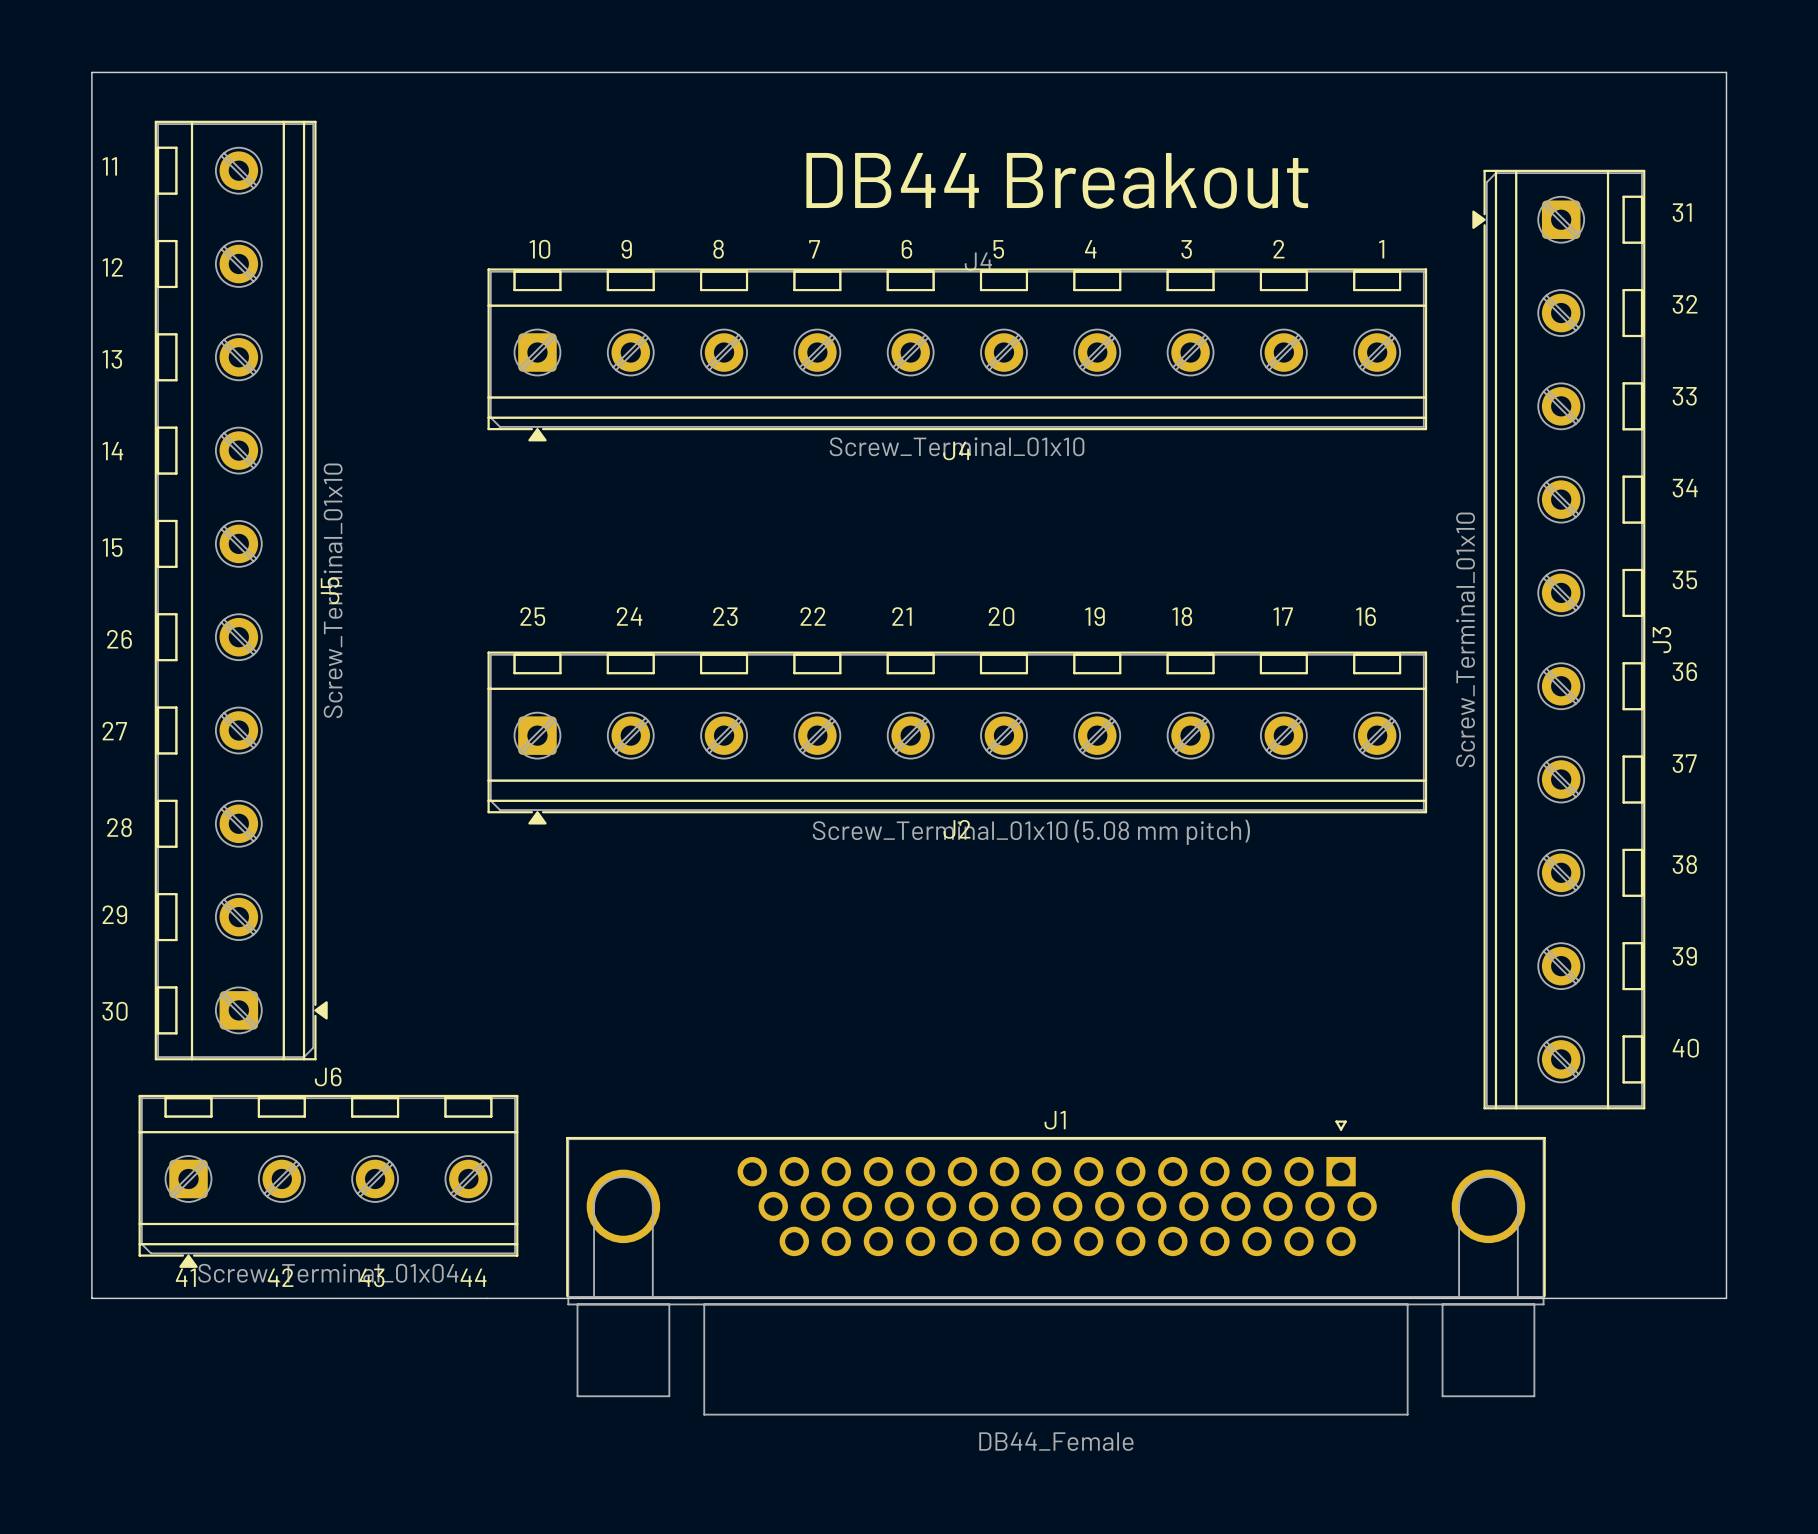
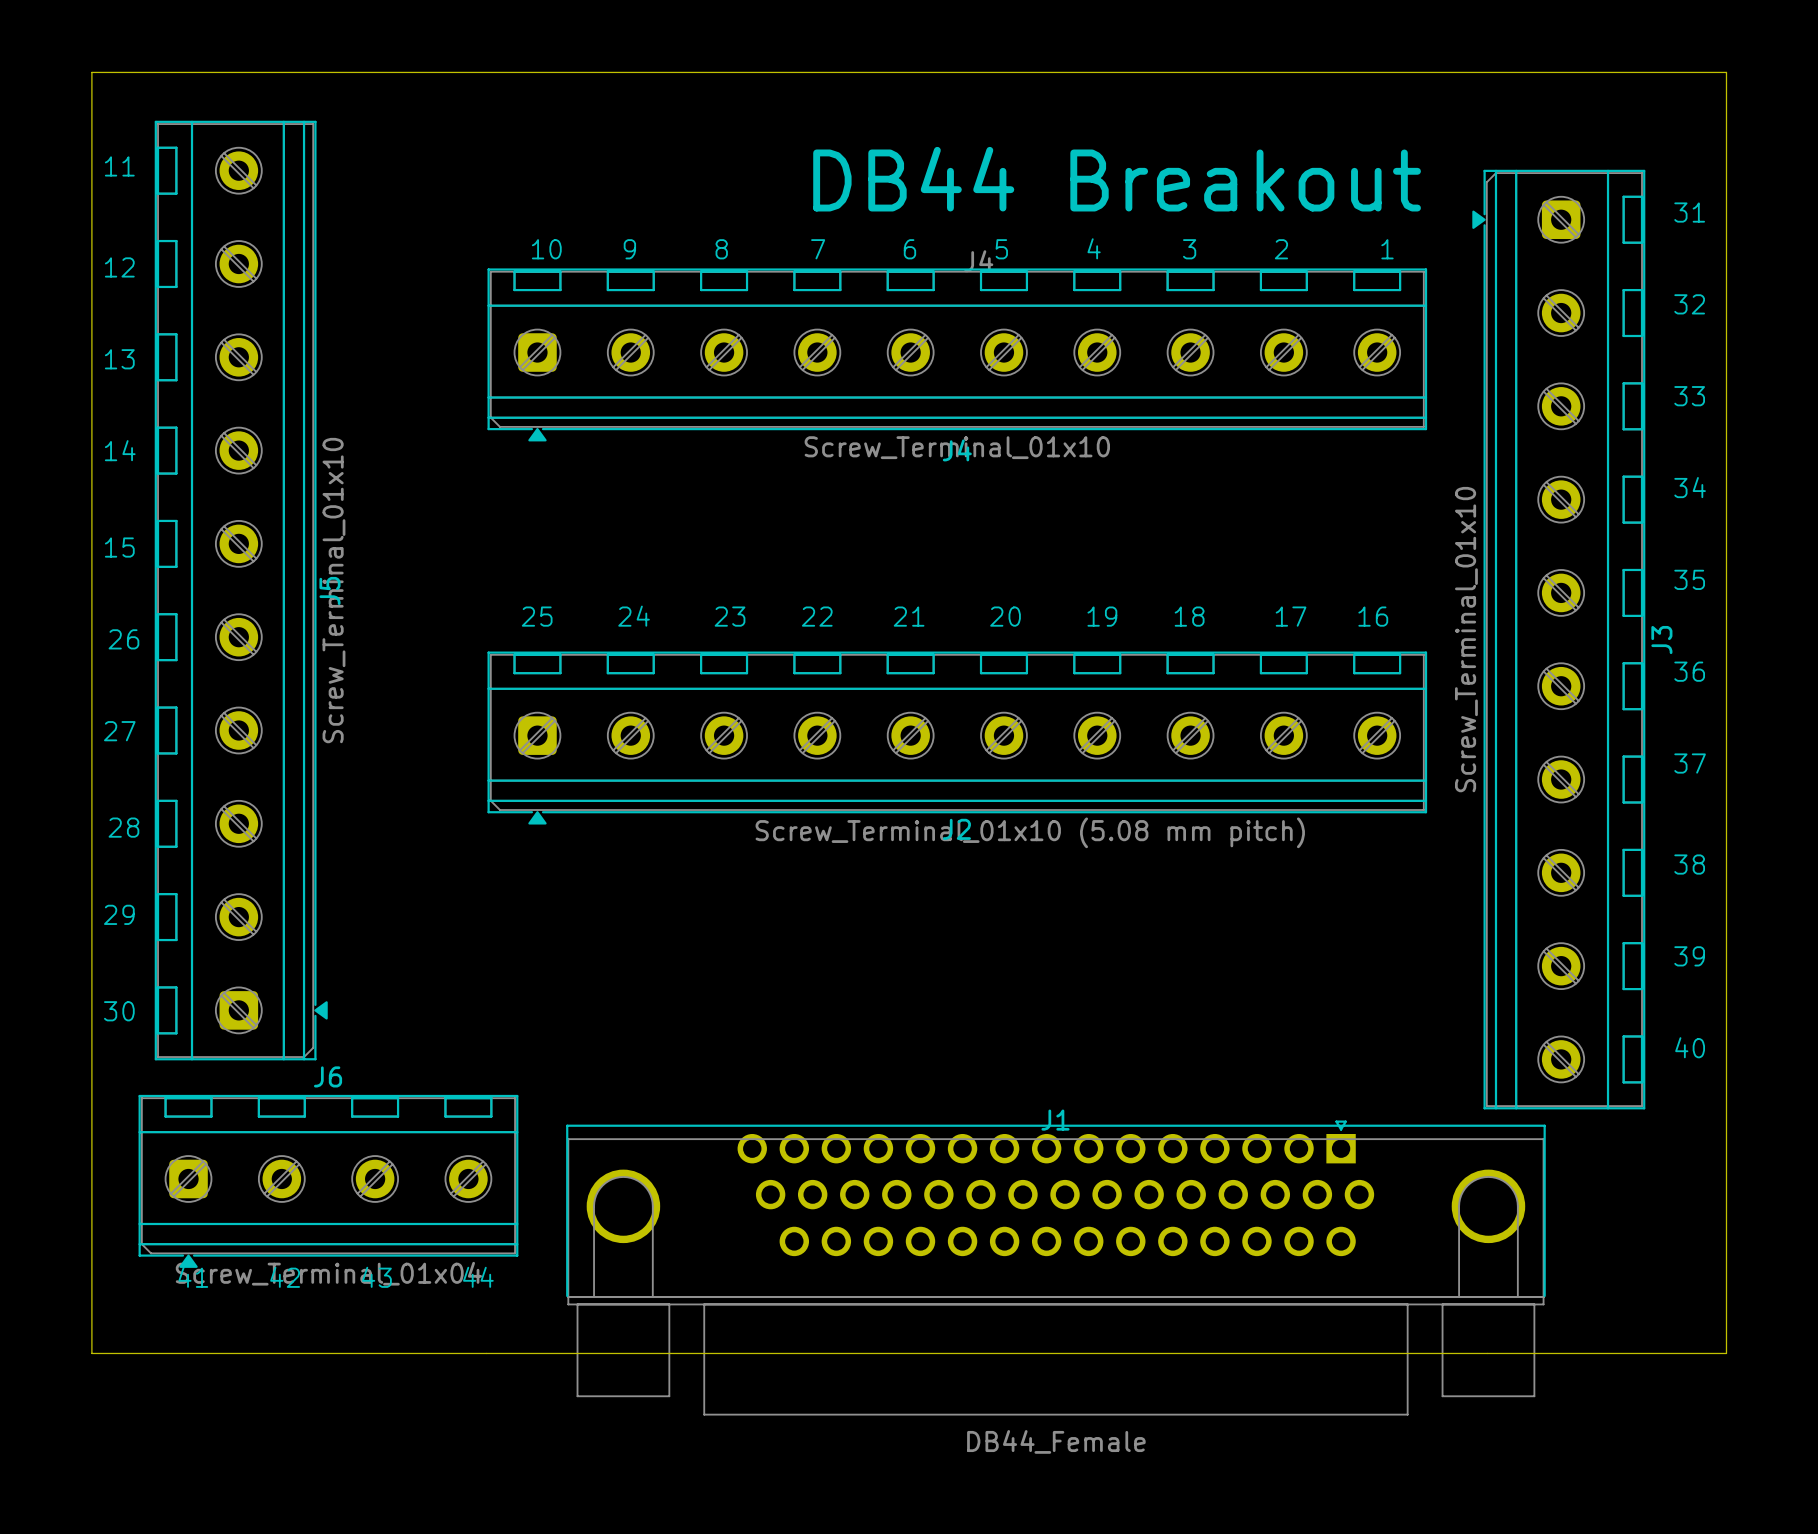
J1 footprint: [566, 1120, 1546, 1416] -> [566, 1120, 1546, 1416]
board edge: (91, 1298) (1726, 1298) -> (91, 1298) (91, 1353) (1726, 1353) (1726, 1298)

